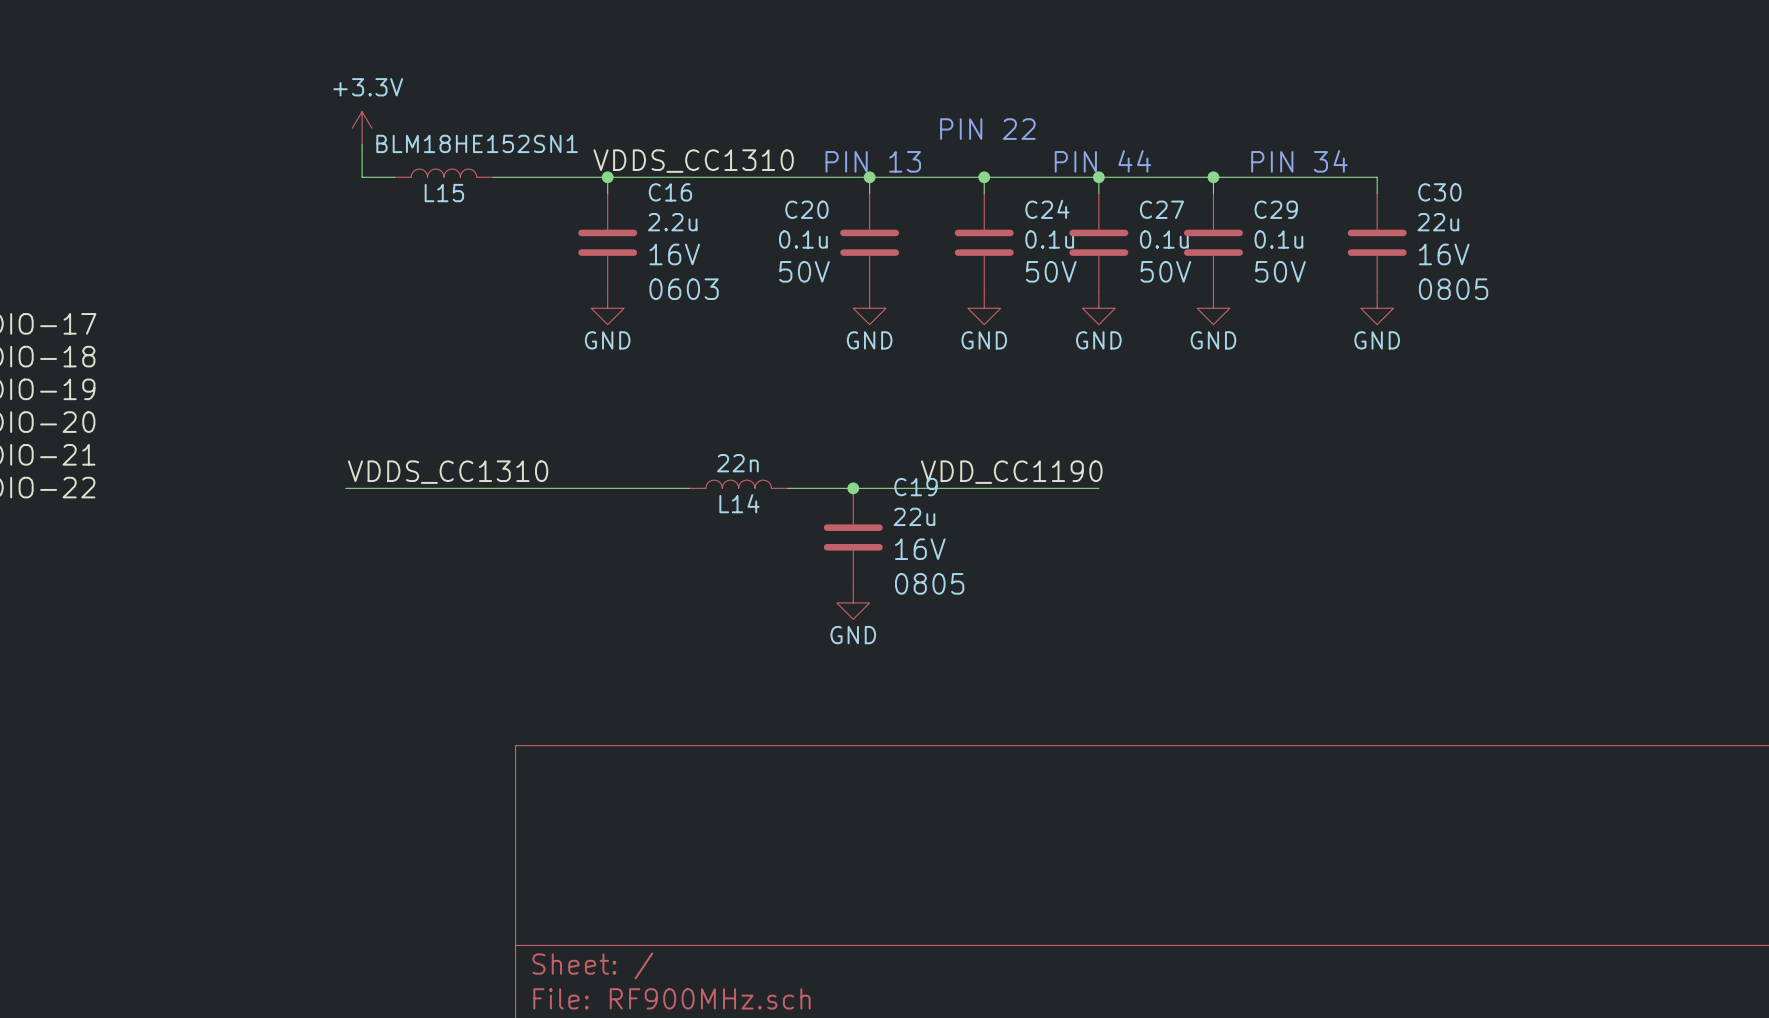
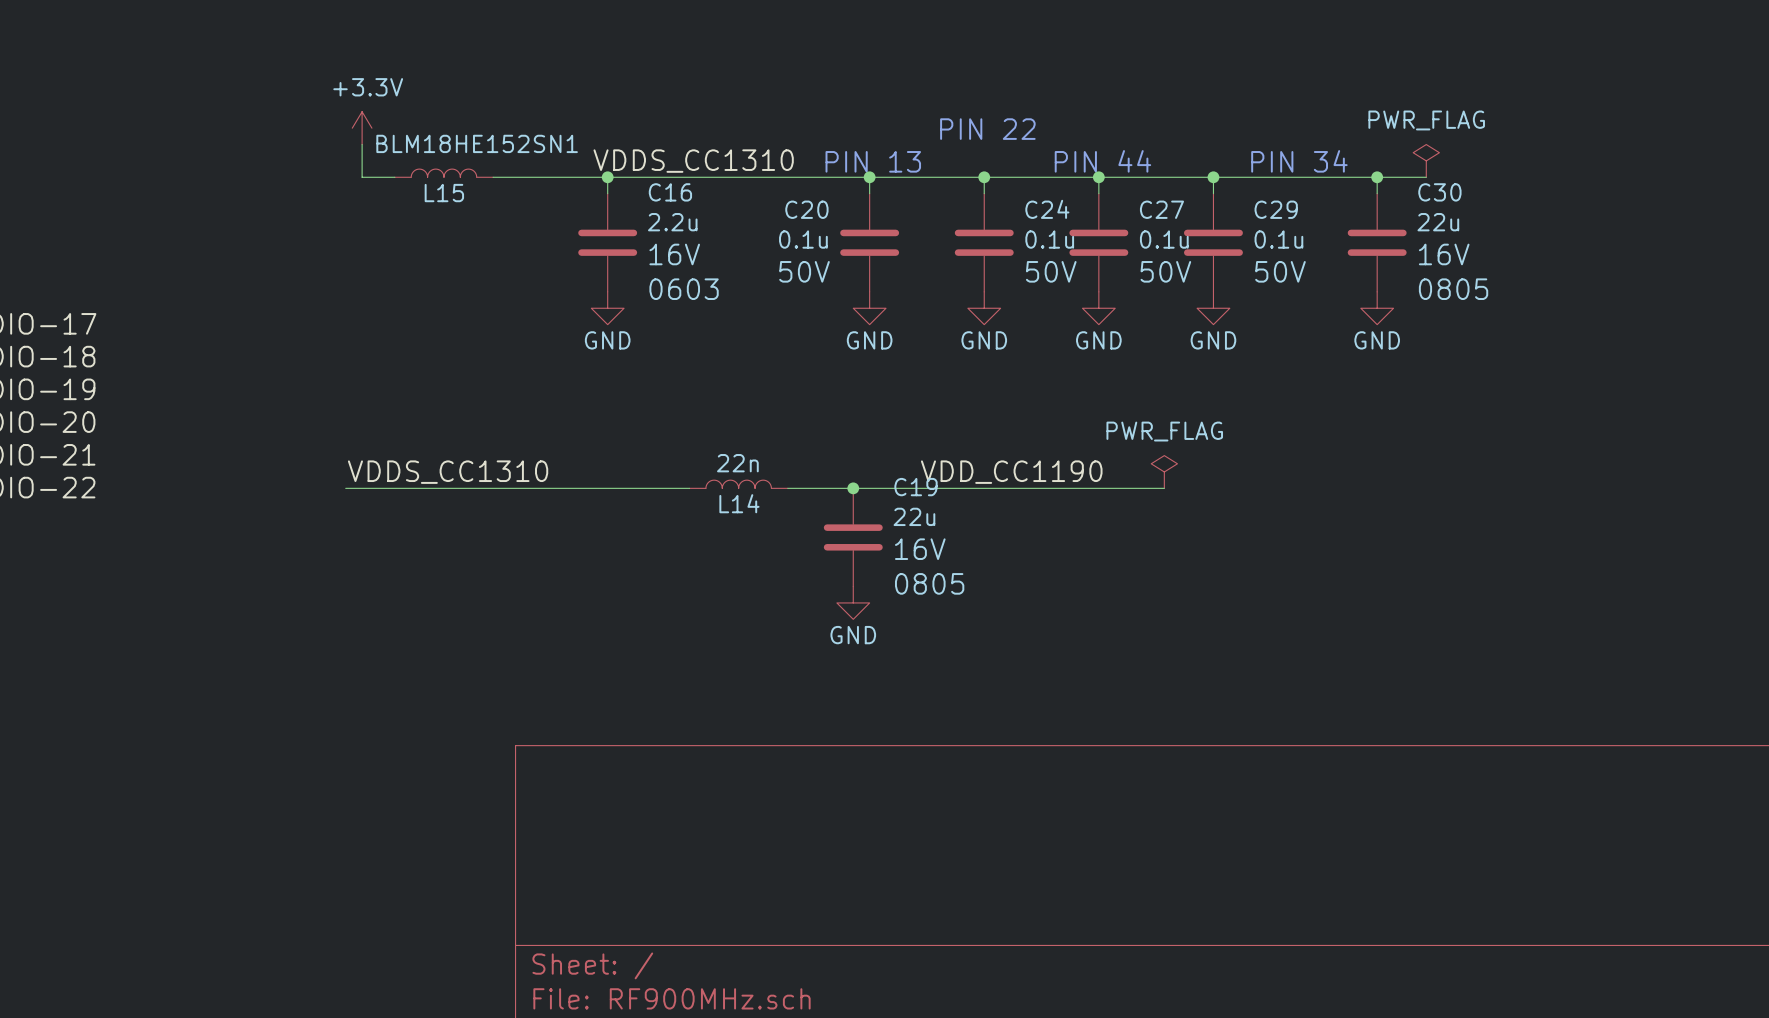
power symbol: none -> PWR_FLAG (1426, 160)
wire: none -> (1377, 177) (1426, 177)
junction: none -> (1377, 177)
power symbol: none -> PWR_FLAG (1164, 471)
wire: none -> (1098, 488) (1164, 488)

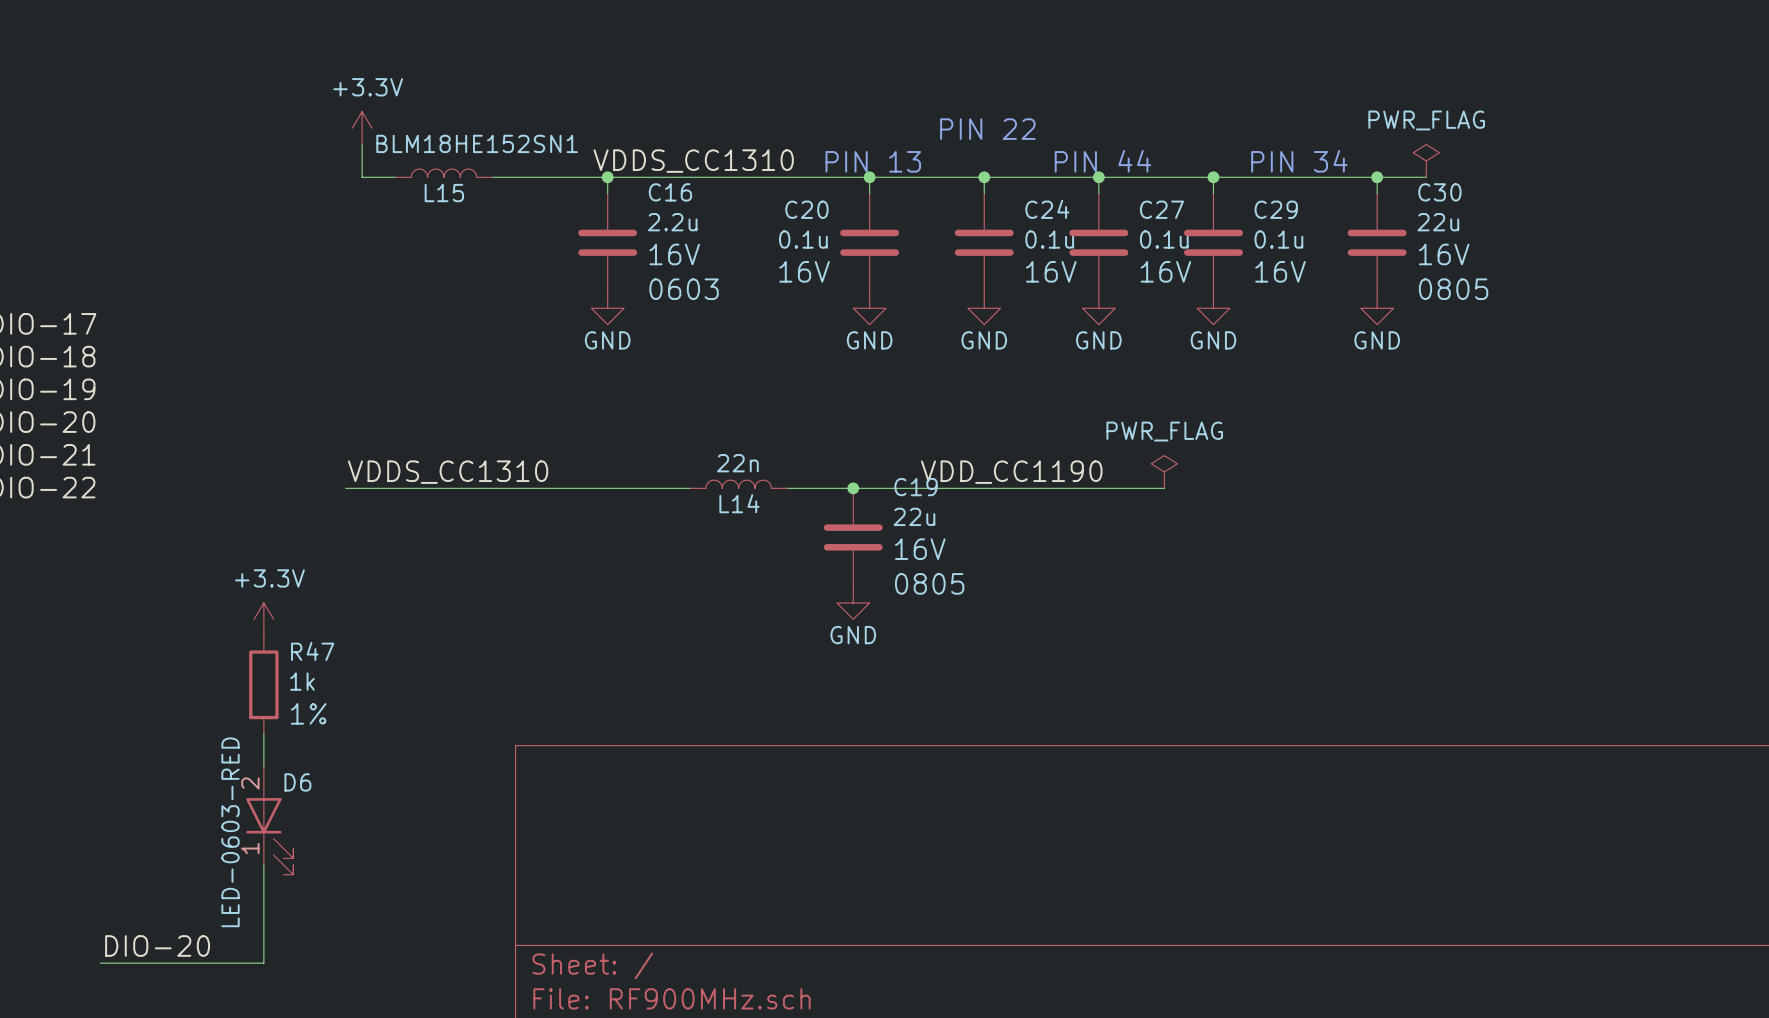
C20 text: 50V (804, 271) -> 16V (804, 271)
C24 text: 50V (1051, 271) -> 16V (1051, 271)
C27 text: 50V (1165, 271) -> 16V (1165, 271)
C29 text: 50V (1280, 271) -> 16V (1280, 271)
power symbol: none -> +3.3V (263, 619)
R47: none -> 1k (263, 684)
wire: none -> (263, 733) (263, 766)
D6: none -> LED-0603-RED (269, 820)
wire: none -> (263, 864) (263, 963) (100, 963)
label: none -> DIO-20 (157, 946)

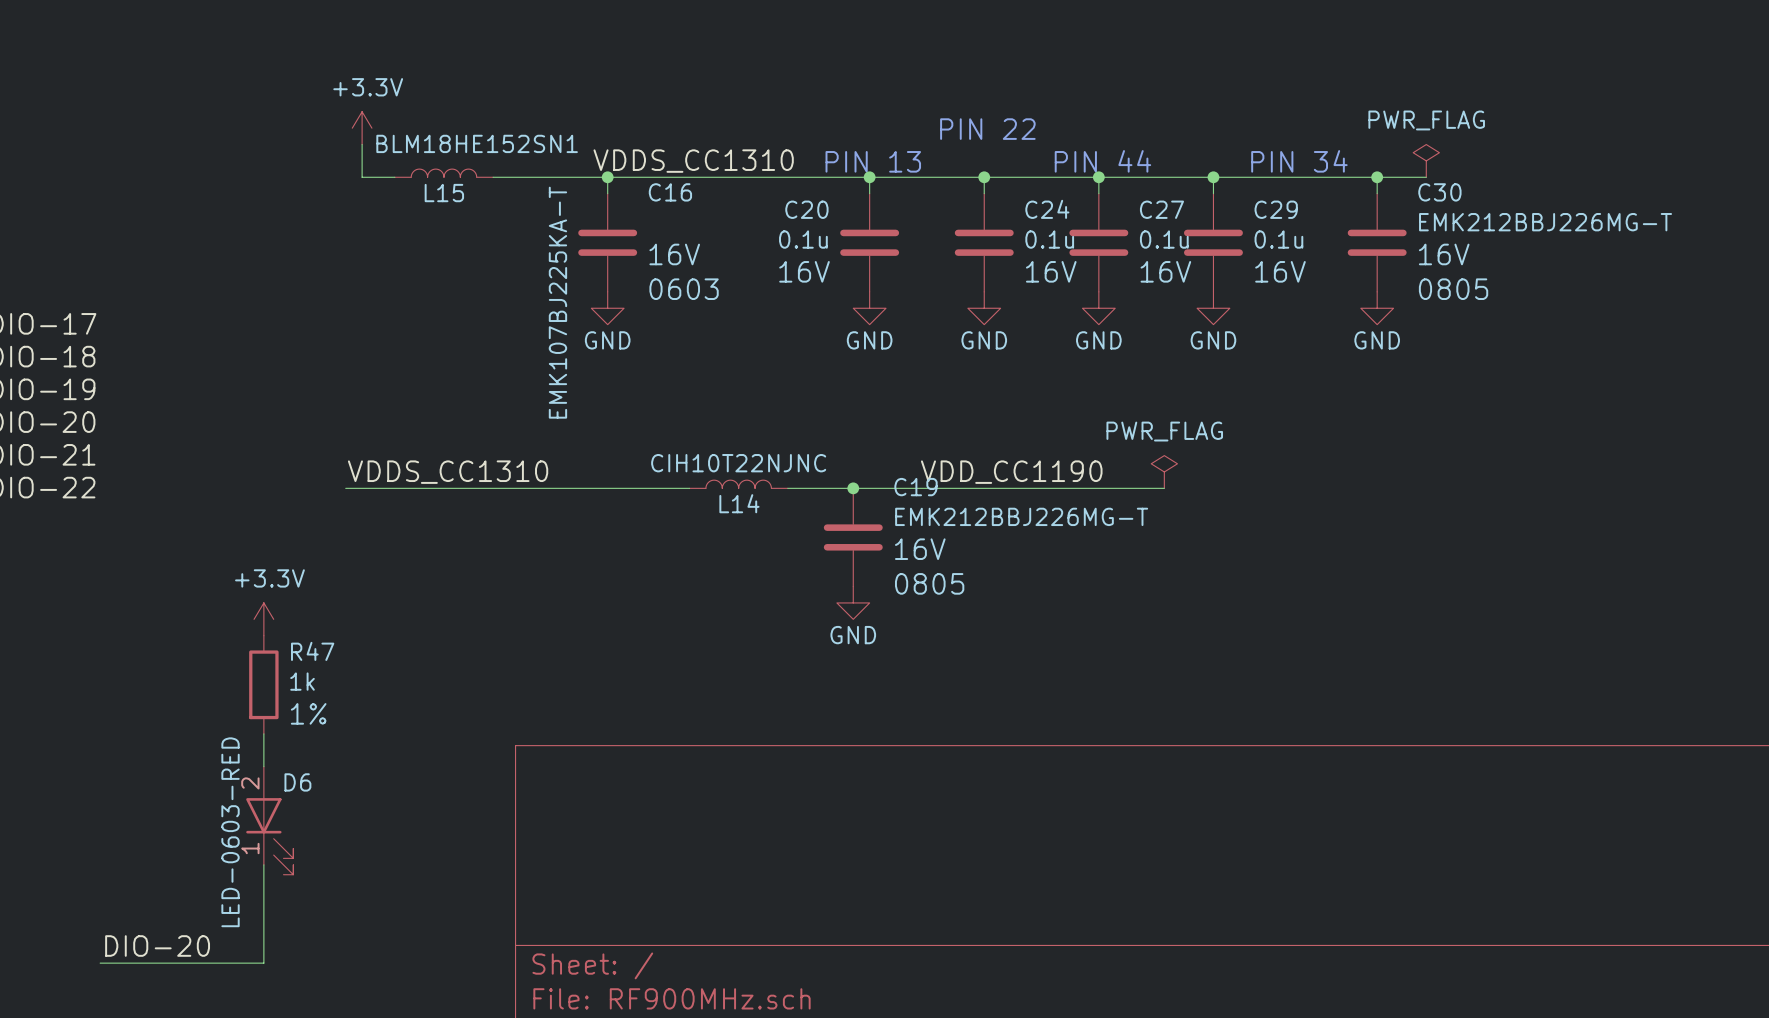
C16 value: 2.2u (672, 222) -> EMK107BJ225KA-T (557, 302)
C30 value: 22u (1438, 222) -> EMK212BBJ226MG-T (1545, 222)
L14 value: 22n (737, 463) -> CIH10T22NJNC (738, 463)
C19 value: 22u (914, 516) -> EMK212BBJ226MG-T (1021, 516)

